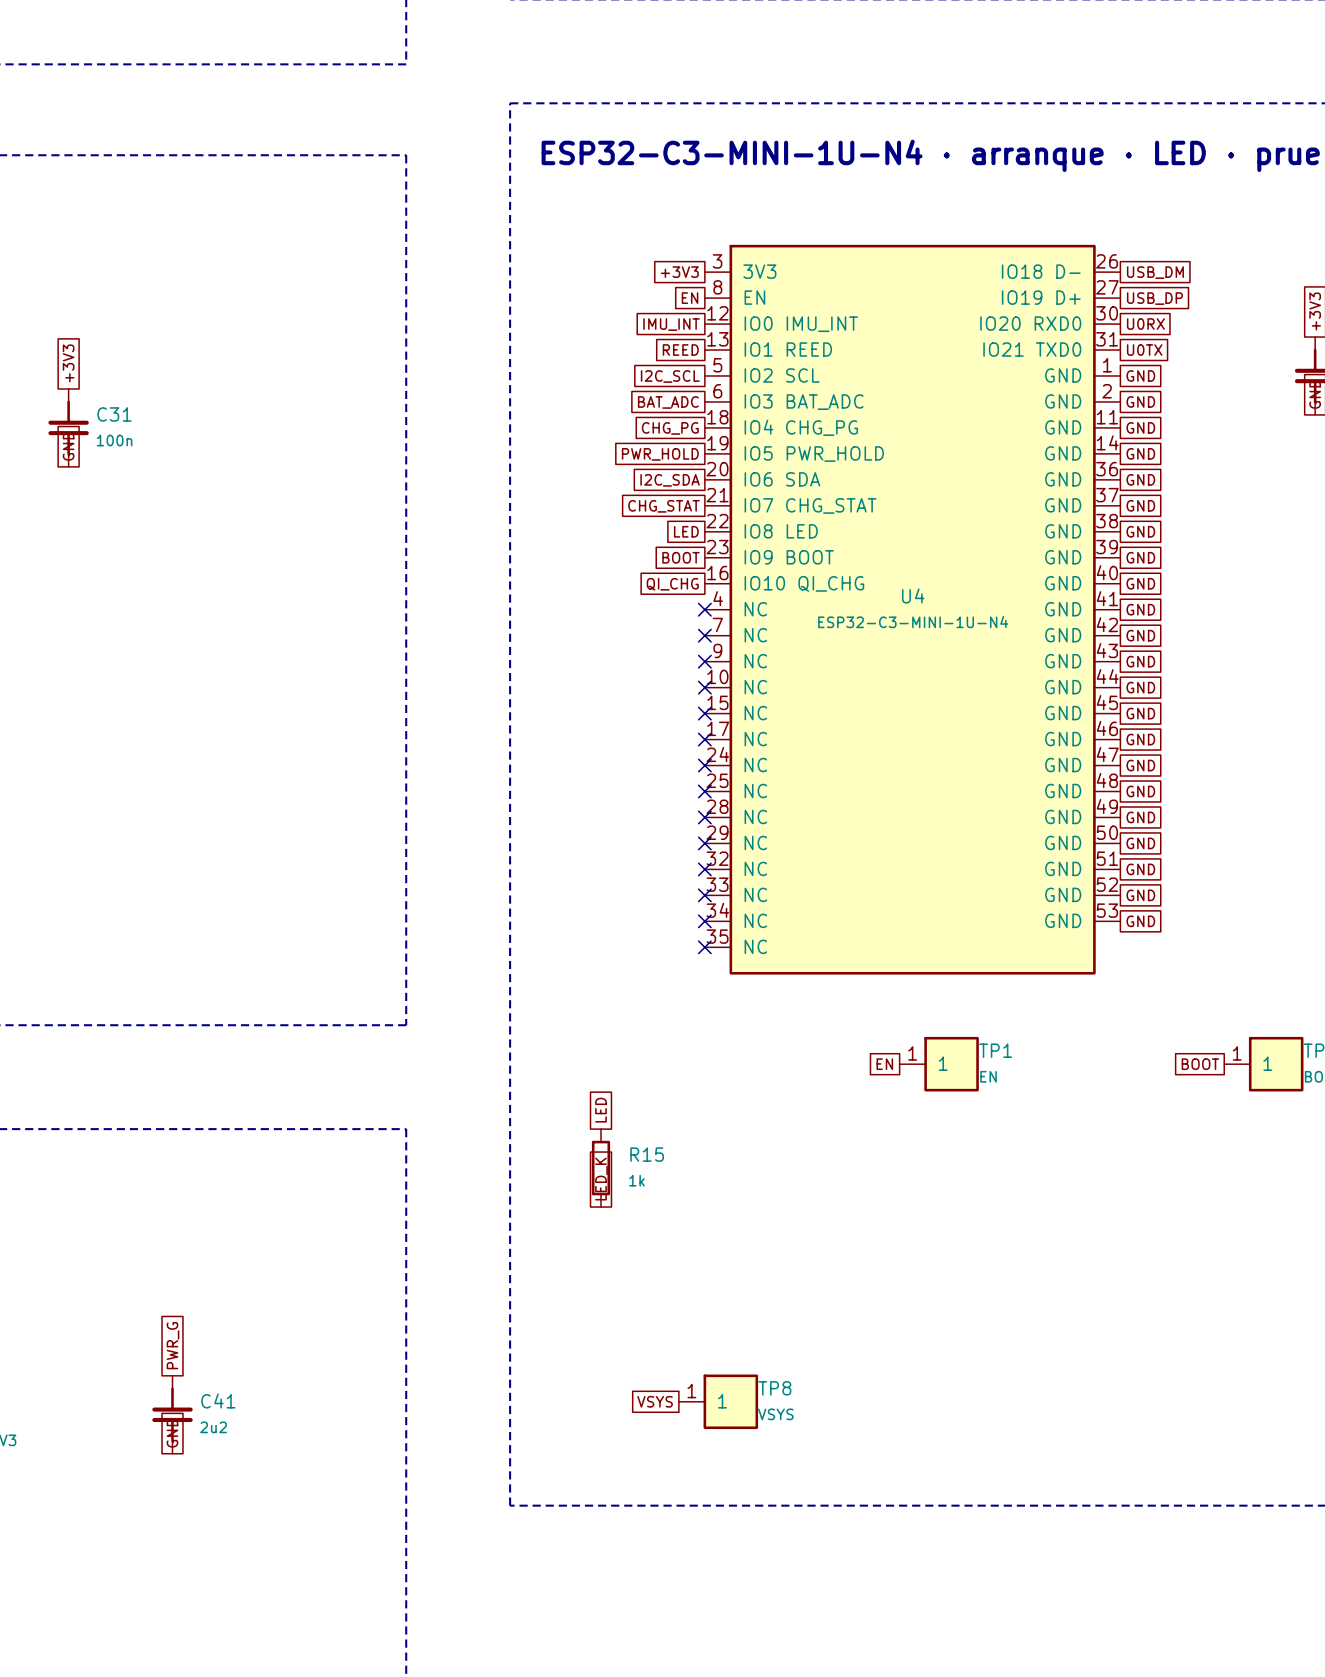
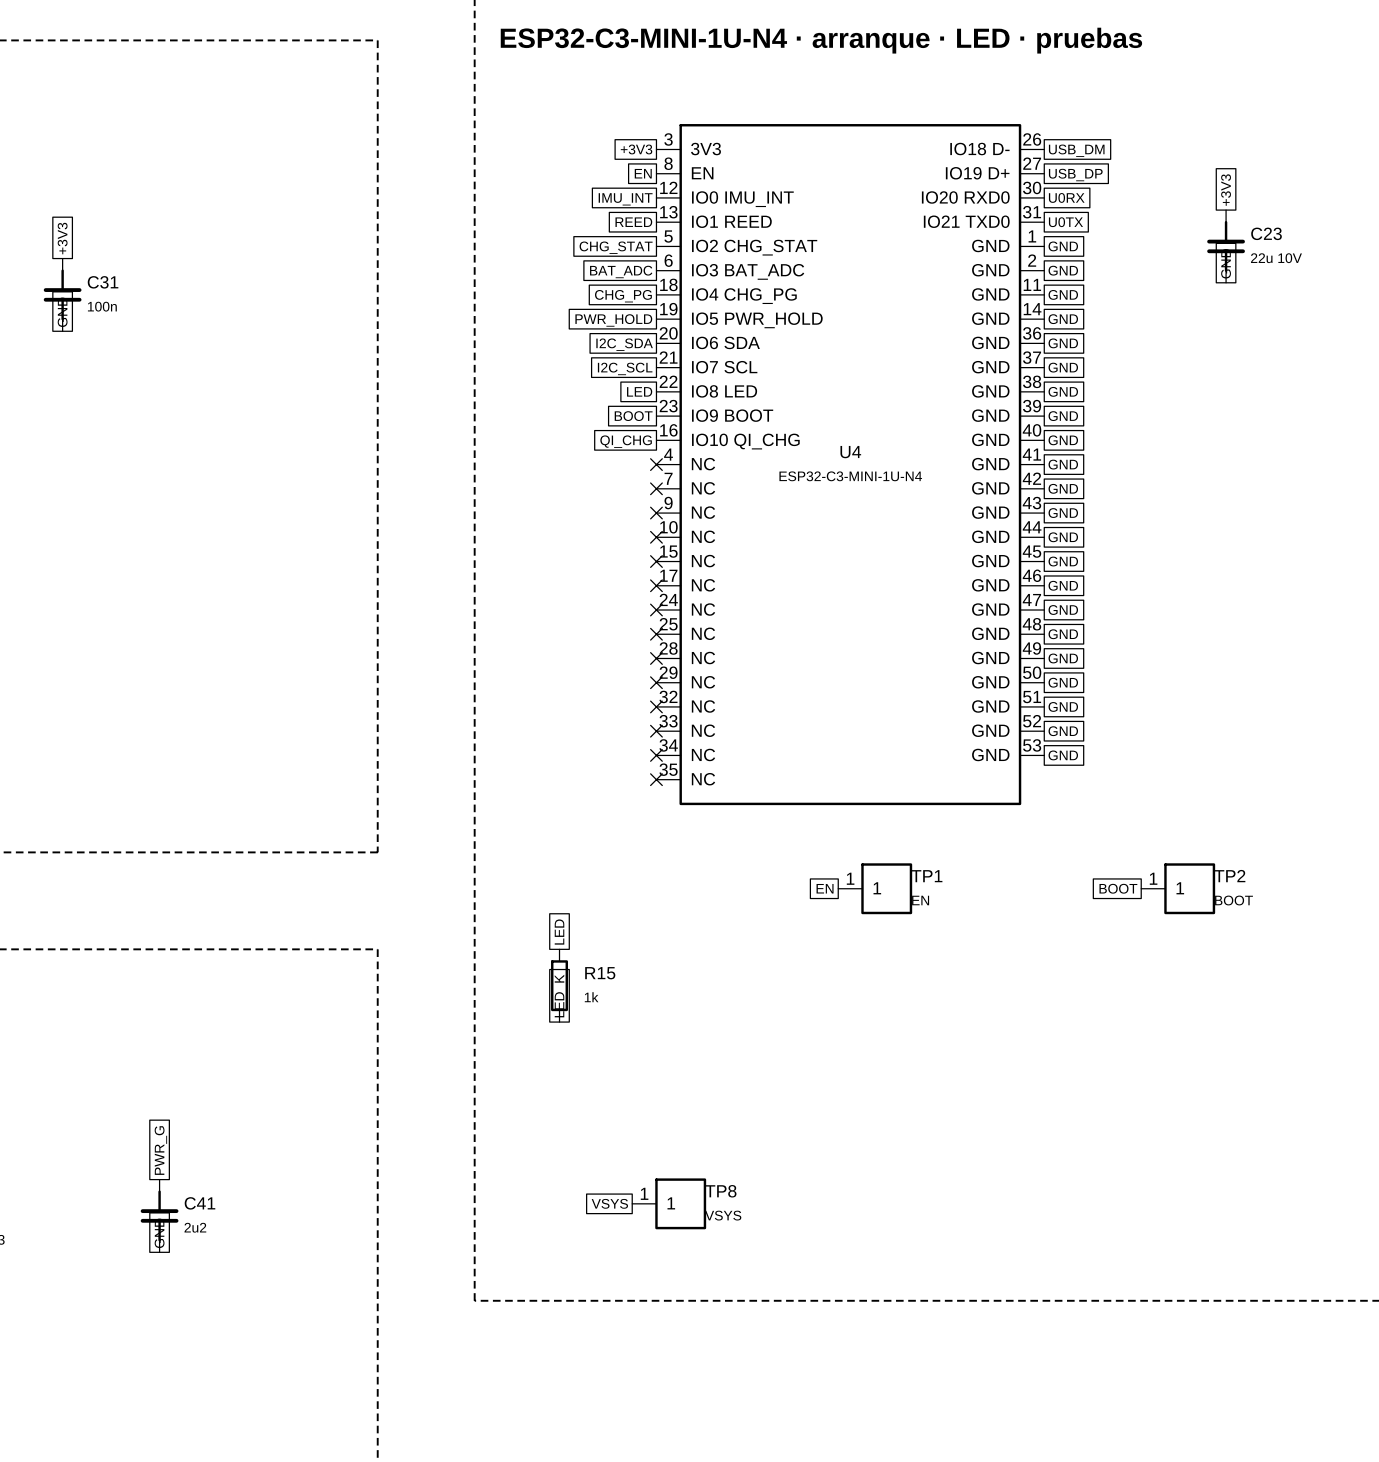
U4 pin name: IO2 SCL (782, 375) -> IO2 CHG_STAT (754, 247)
global label: I2C_SCL (670, 376) -> CHG_STAT (616, 247)
U4 pin name: IO7 CHG_STAT (810, 505) -> IO7 SCL (724, 367)
global label: CHG_STAT (663, 506) -> I2C_SCL (625, 368)

